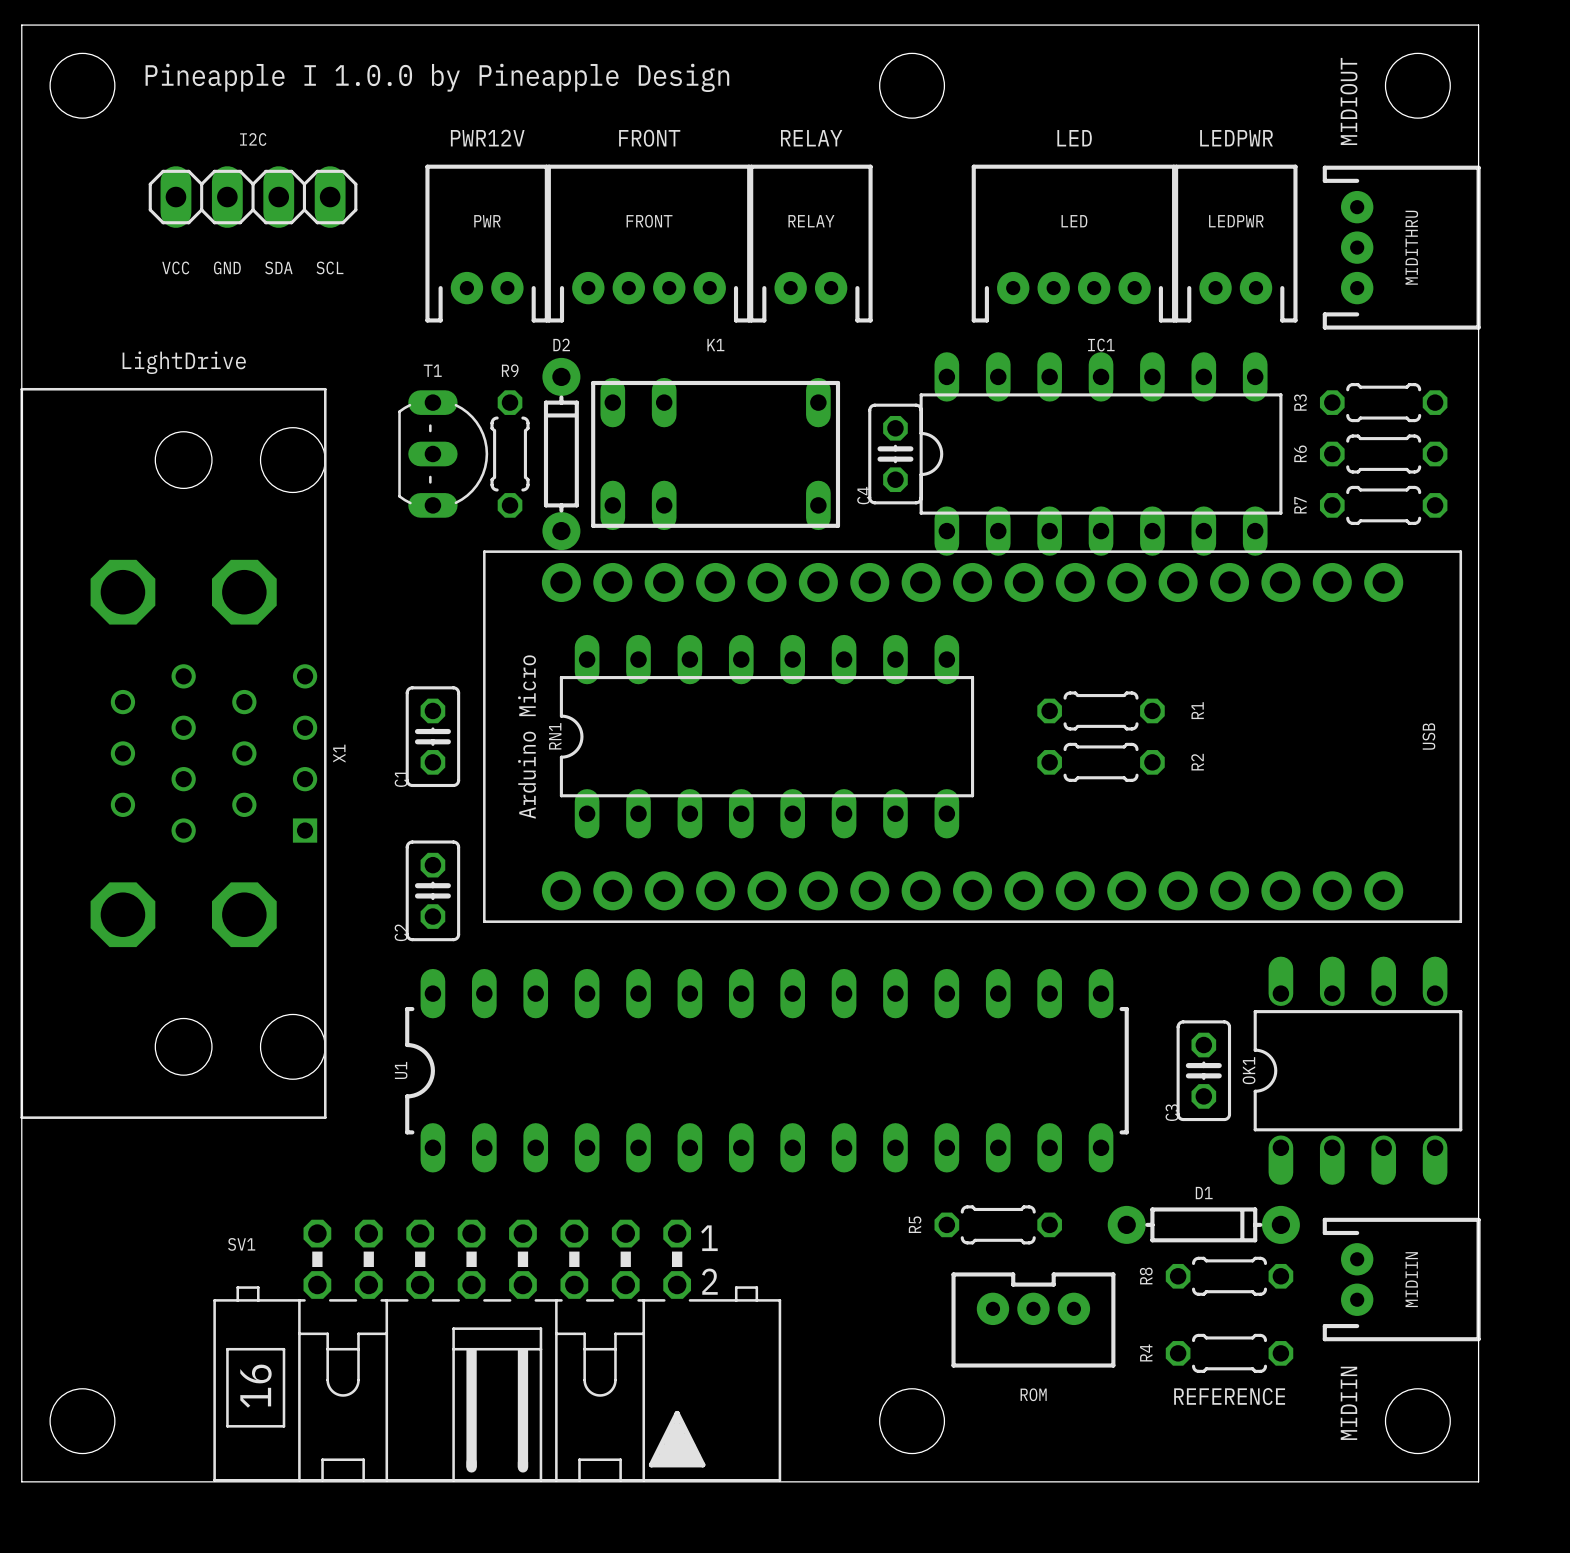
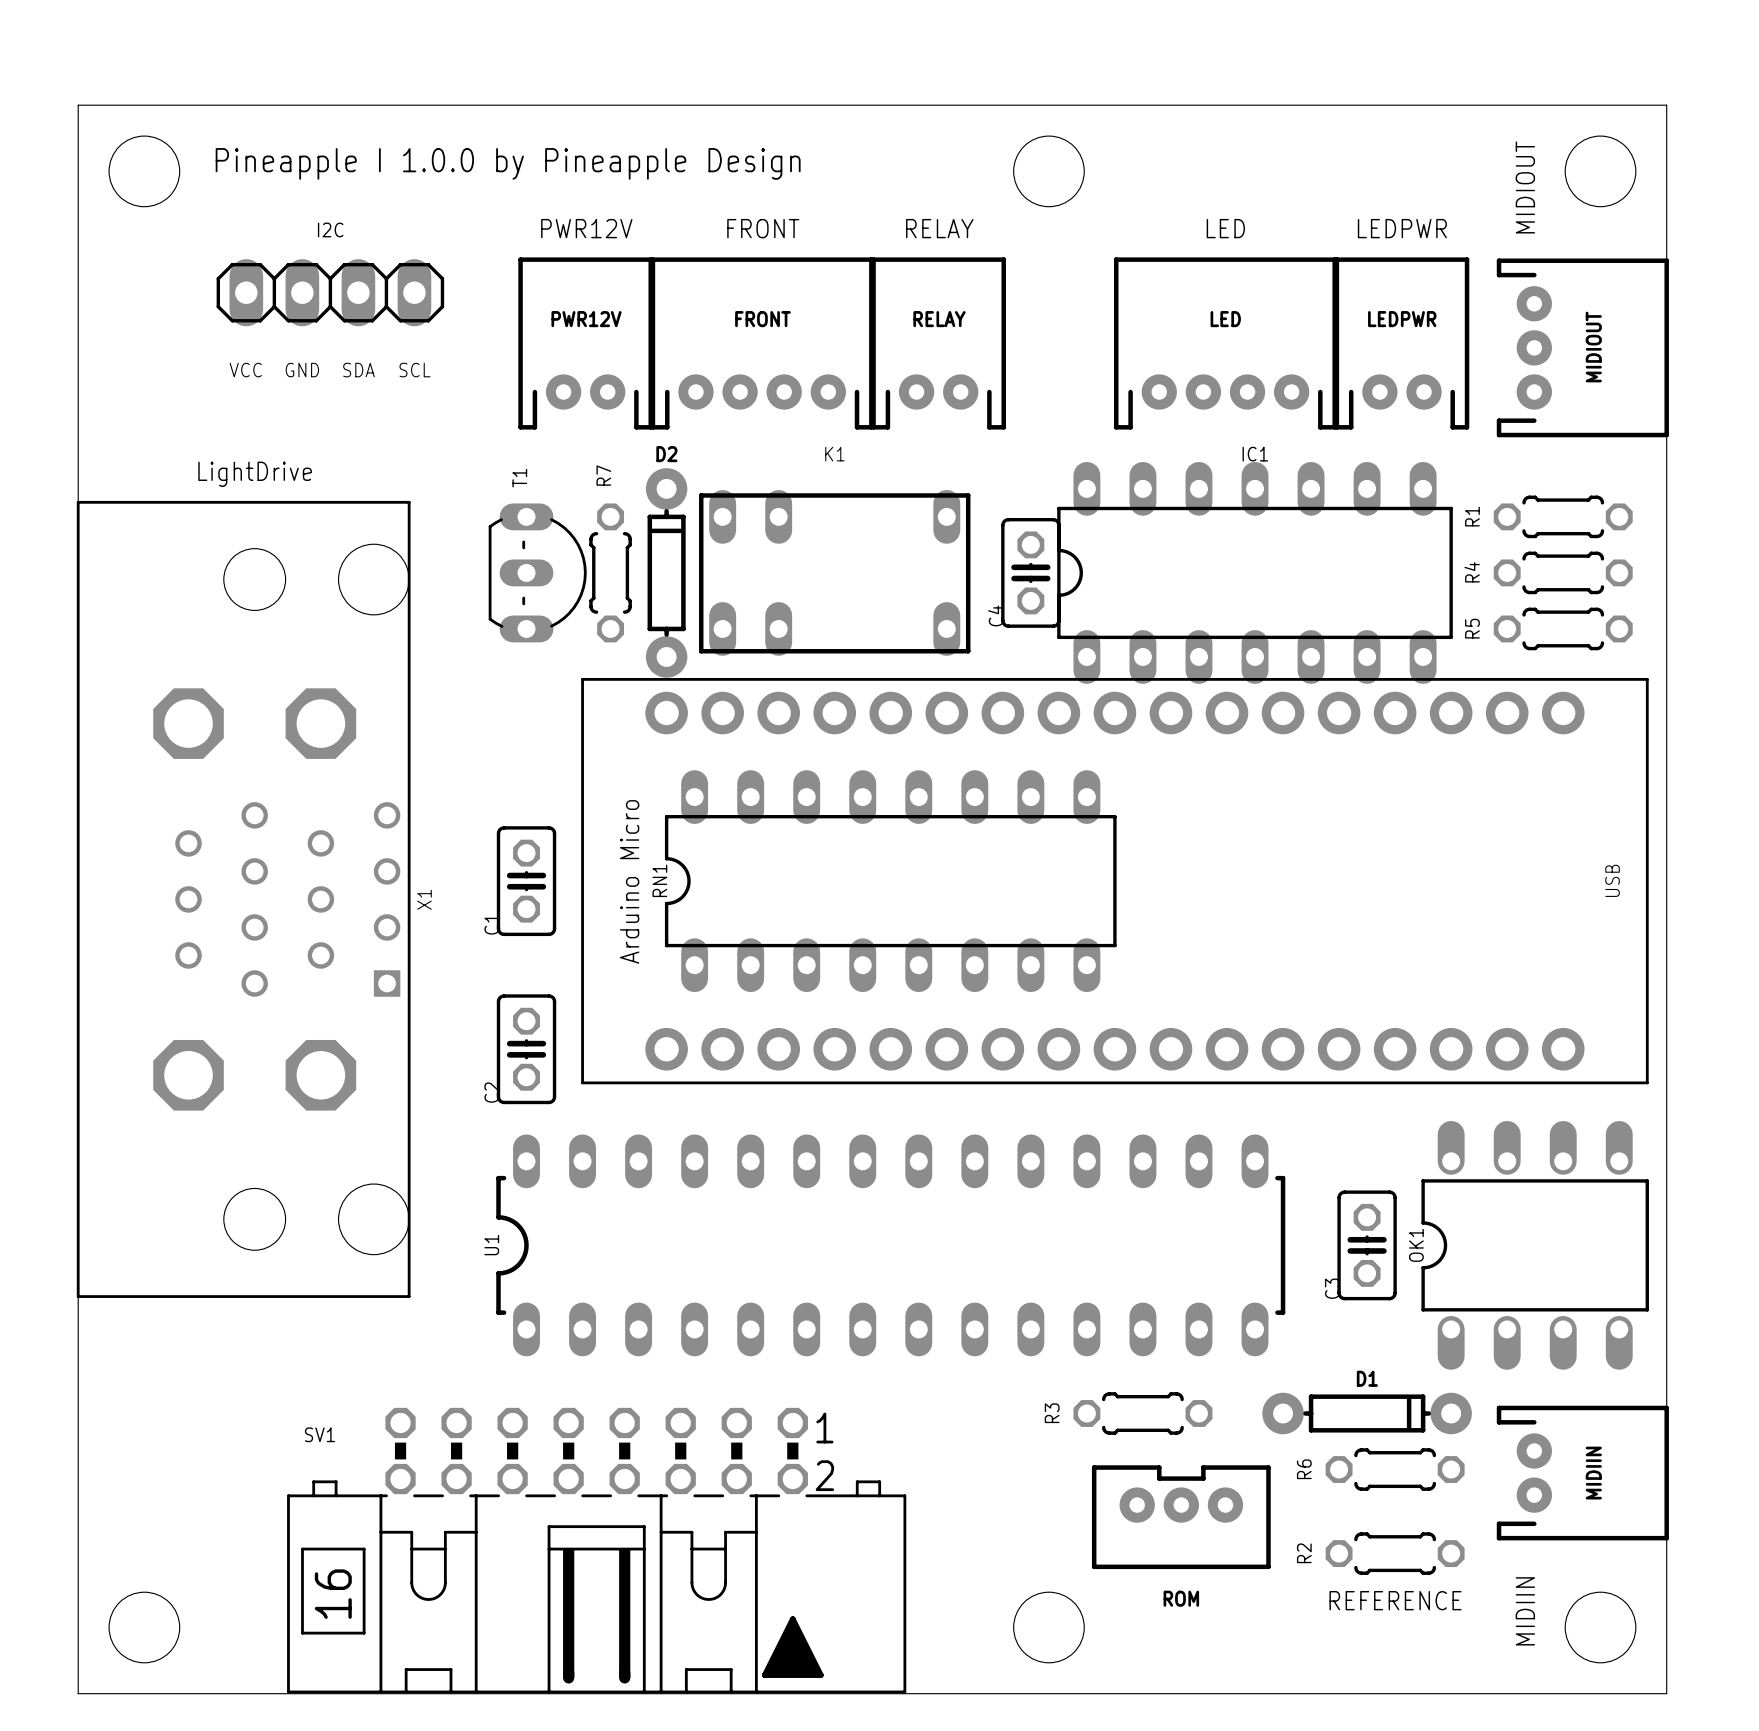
PWR name: PWR (487, 221) -> PWR12V (586, 319)
MIDITHRU name: MIDITHRU (1411, 247) -> MIDIOUT (1593, 347)
T1 name rotation: 0° (432, 370) -> 90° counterclockwise (519, 478)
R9 name: R9 (510, 370) -> R7 (603, 475)
R3 name: R3 (1300, 402) -> R1 (1472, 516)
R6 name: R6 (1300, 453) -> R4 (1472, 572)
R7 name: R7 (1300, 505) -> R5 (1472, 628)
R1: (1101, 710) -> none
R2: (1101, 762) -> none
R5 name: R5 (915, 1224) -> R3 (1052, 1413)
R8 name: R8 (1146, 1276) -> R6 (1304, 1469)
R4 name: R4 (1146, 1352) -> R2 (1304, 1553)

